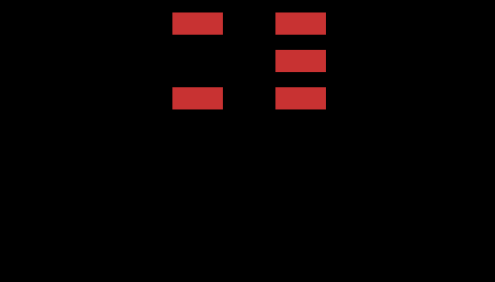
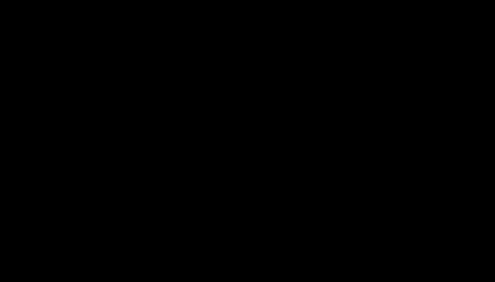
part: (249, 60) -> none

